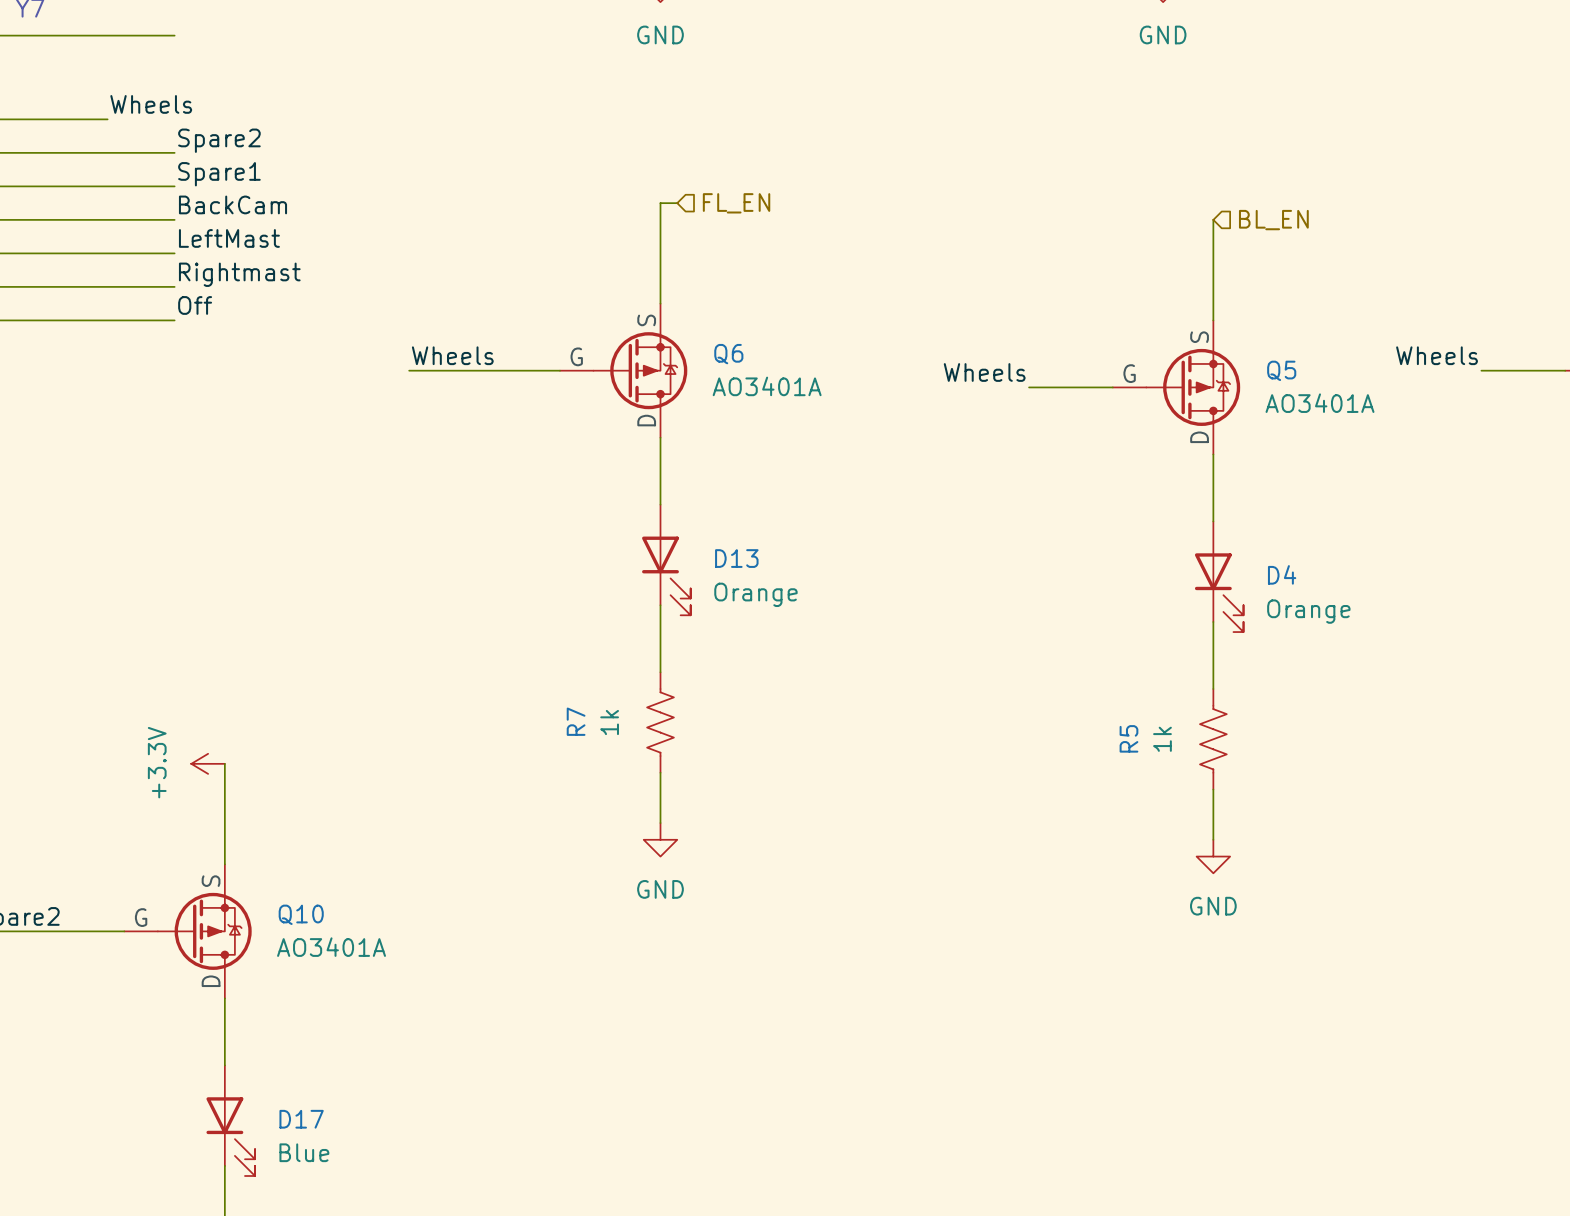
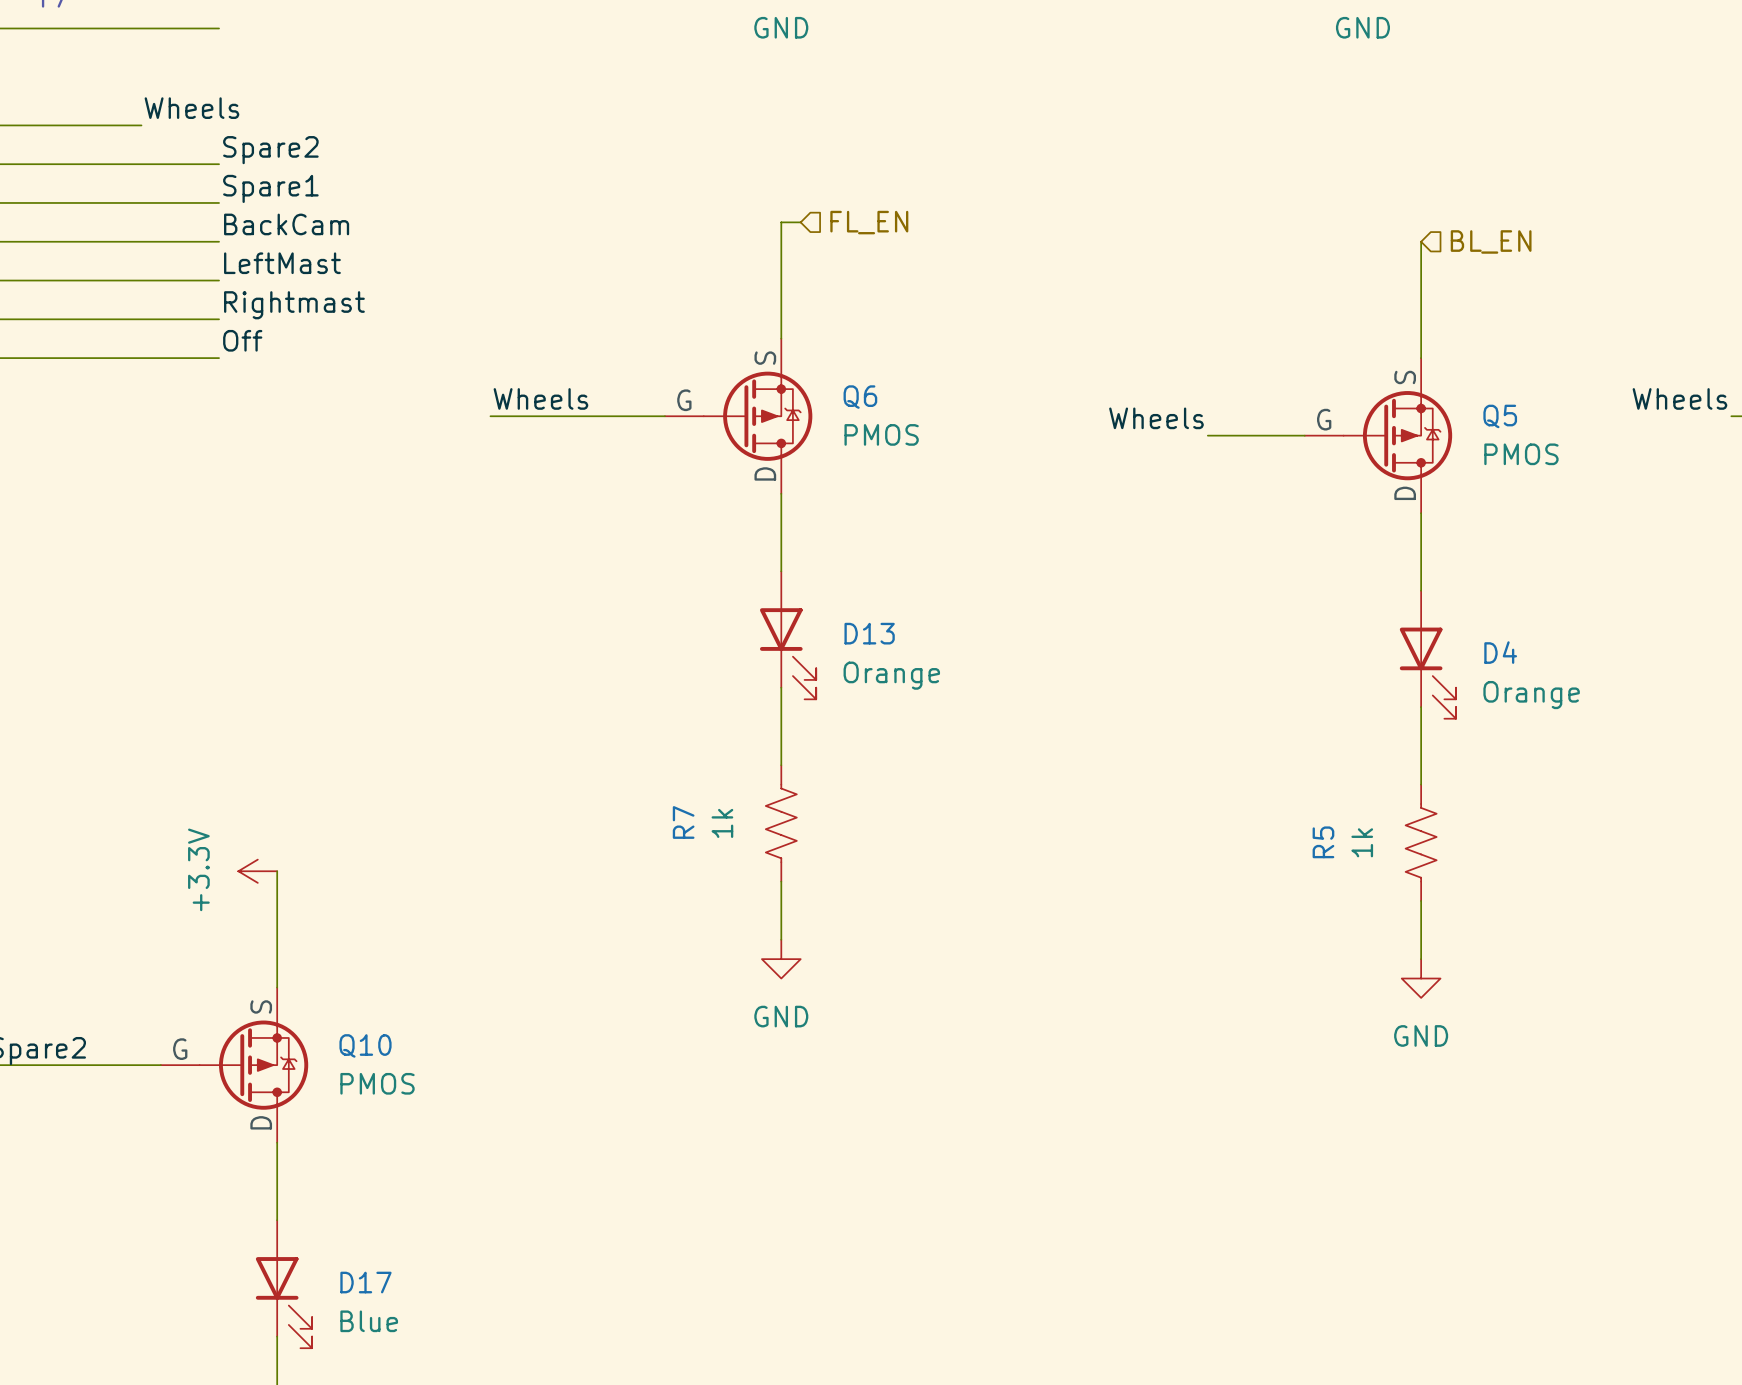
Q6 value: AO3401A (767, 386) -> PMOS (881, 434)
Q5 value: AO3401A (1320, 403) -> PMOS (1521, 454)
Q10 value: AO3401A (331, 947) -> PMOS (377, 1083)

